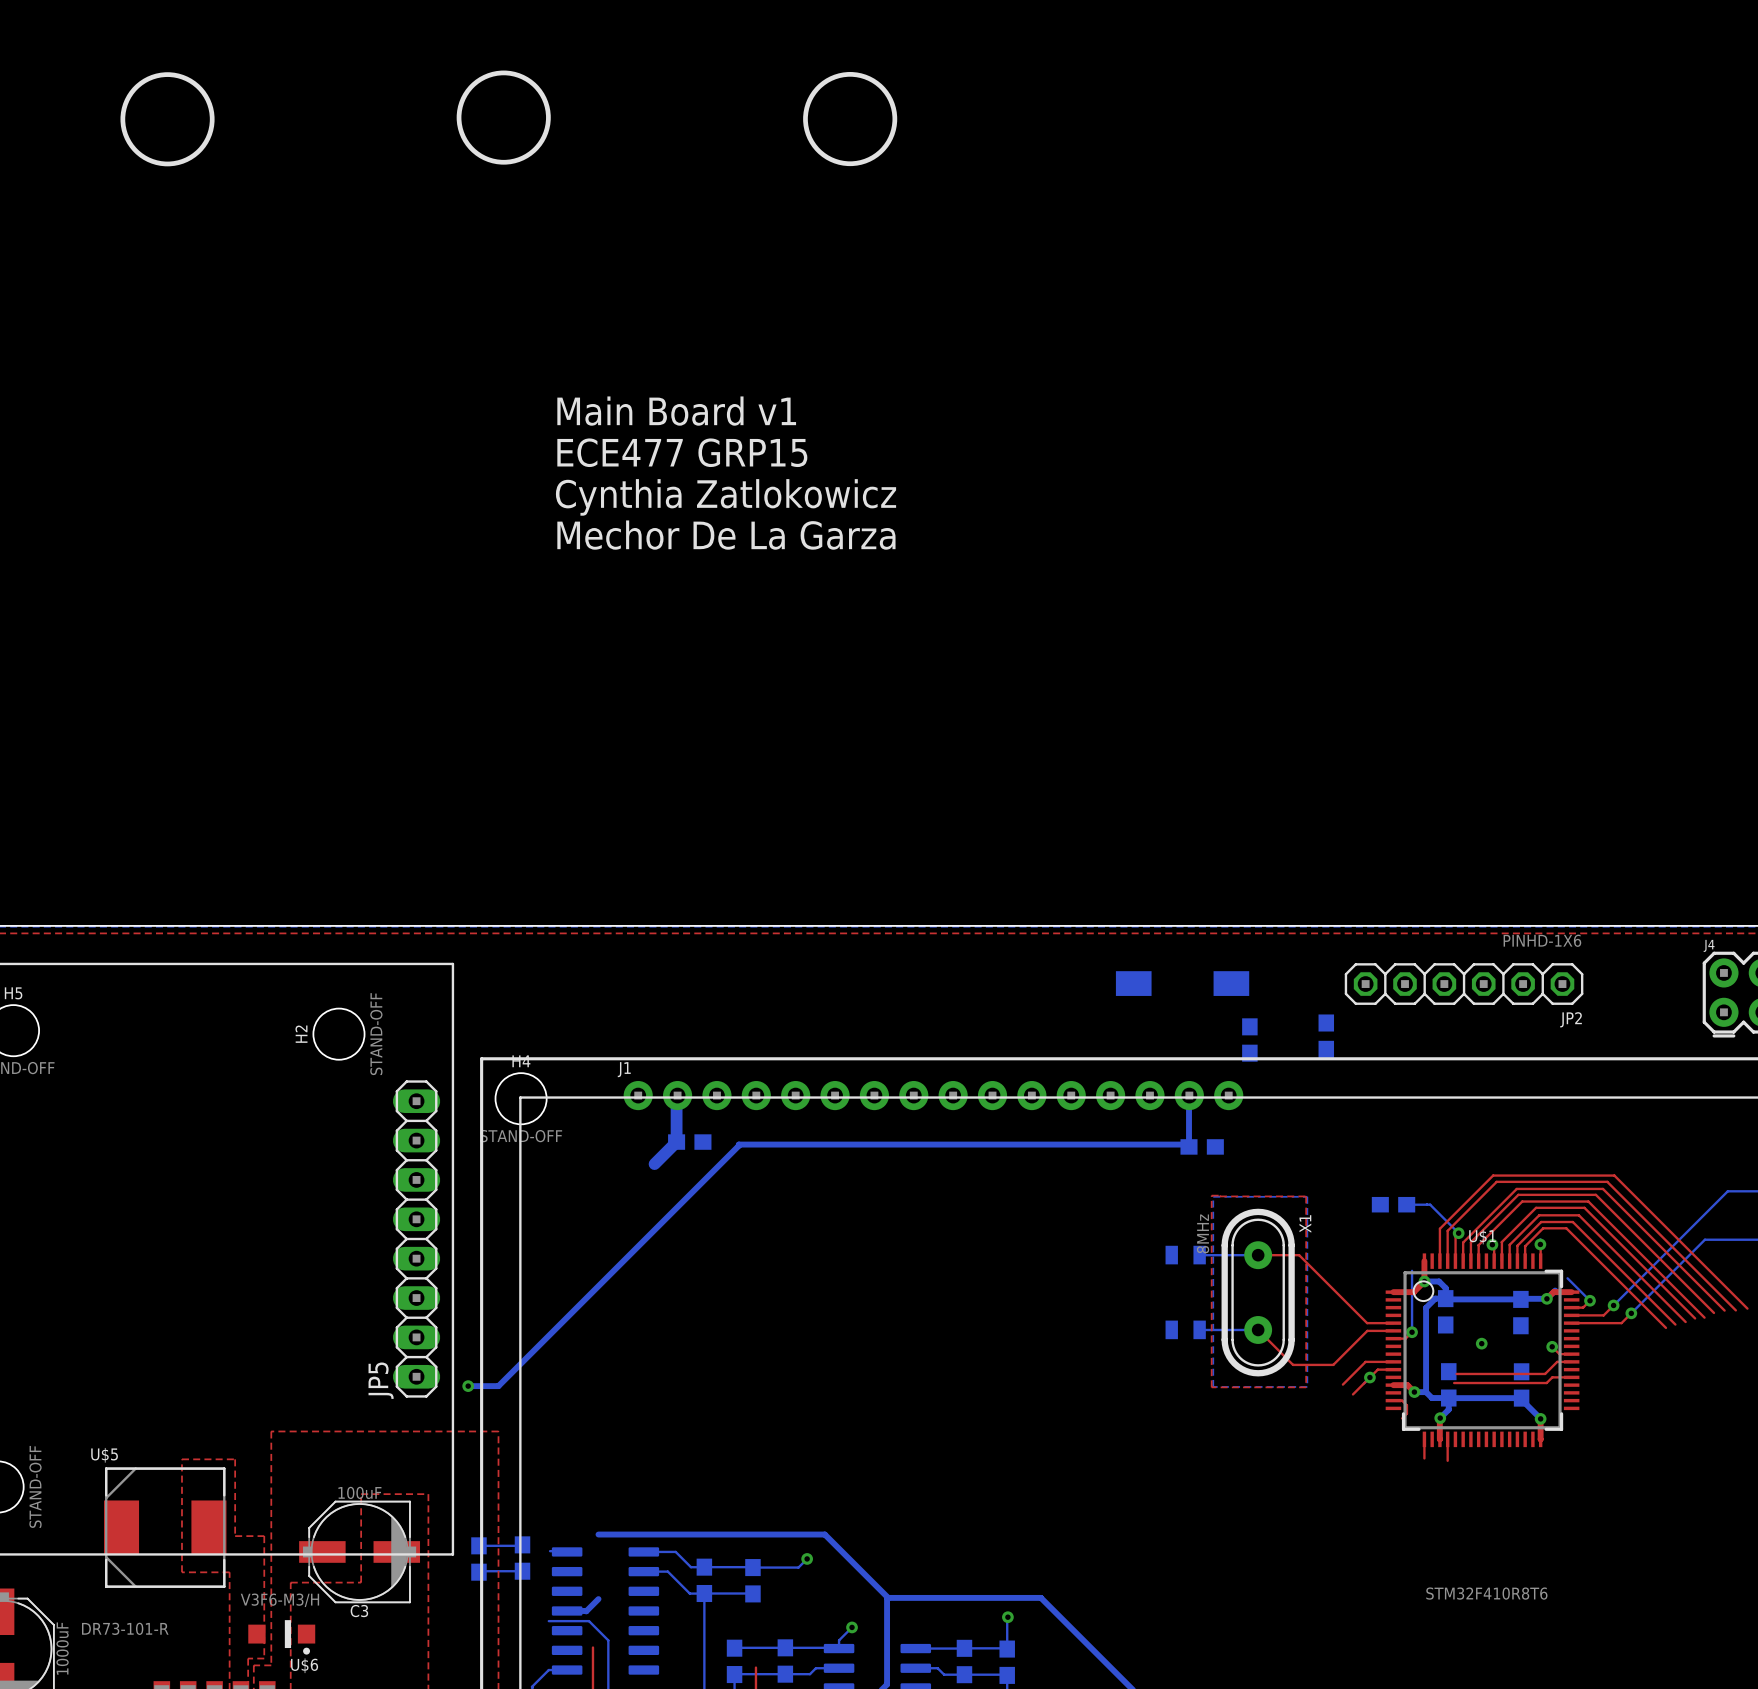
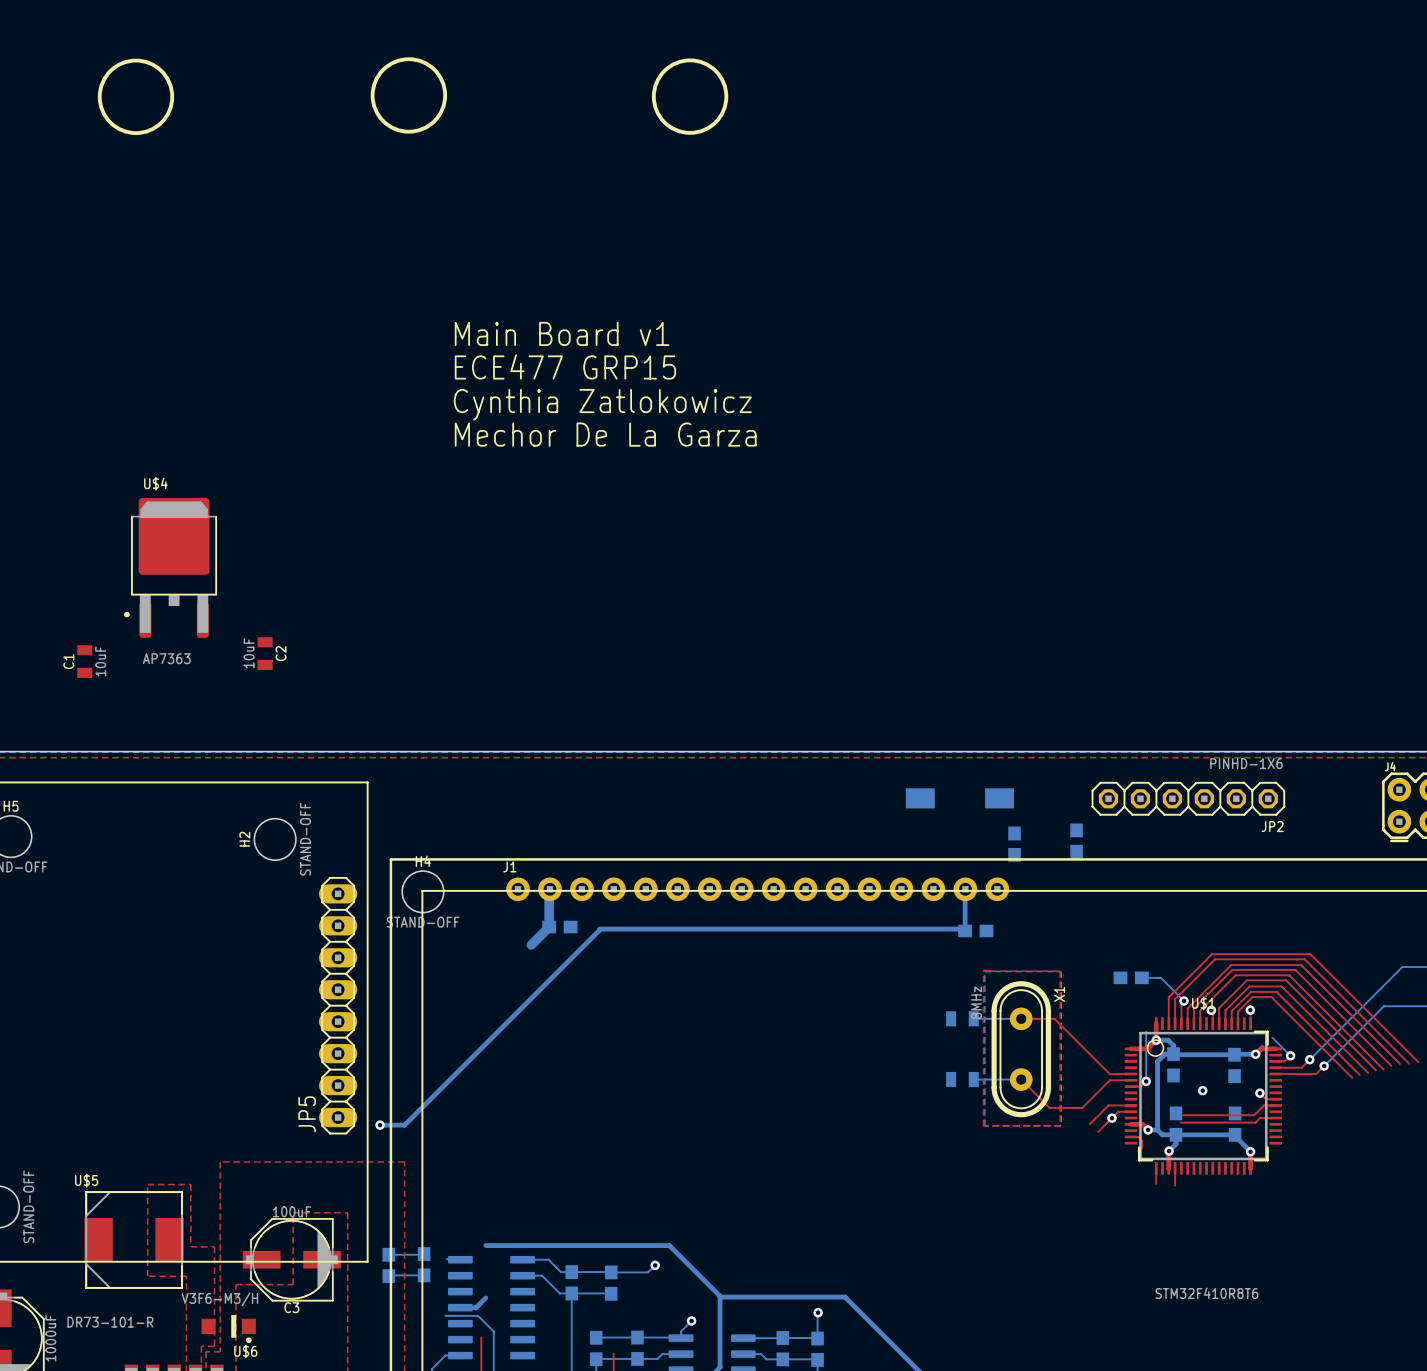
U$4: none -> AP7363 (170, 567)
C2: none -> 10uF (265, 653)
C1: none -> 10uF (84, 661)

